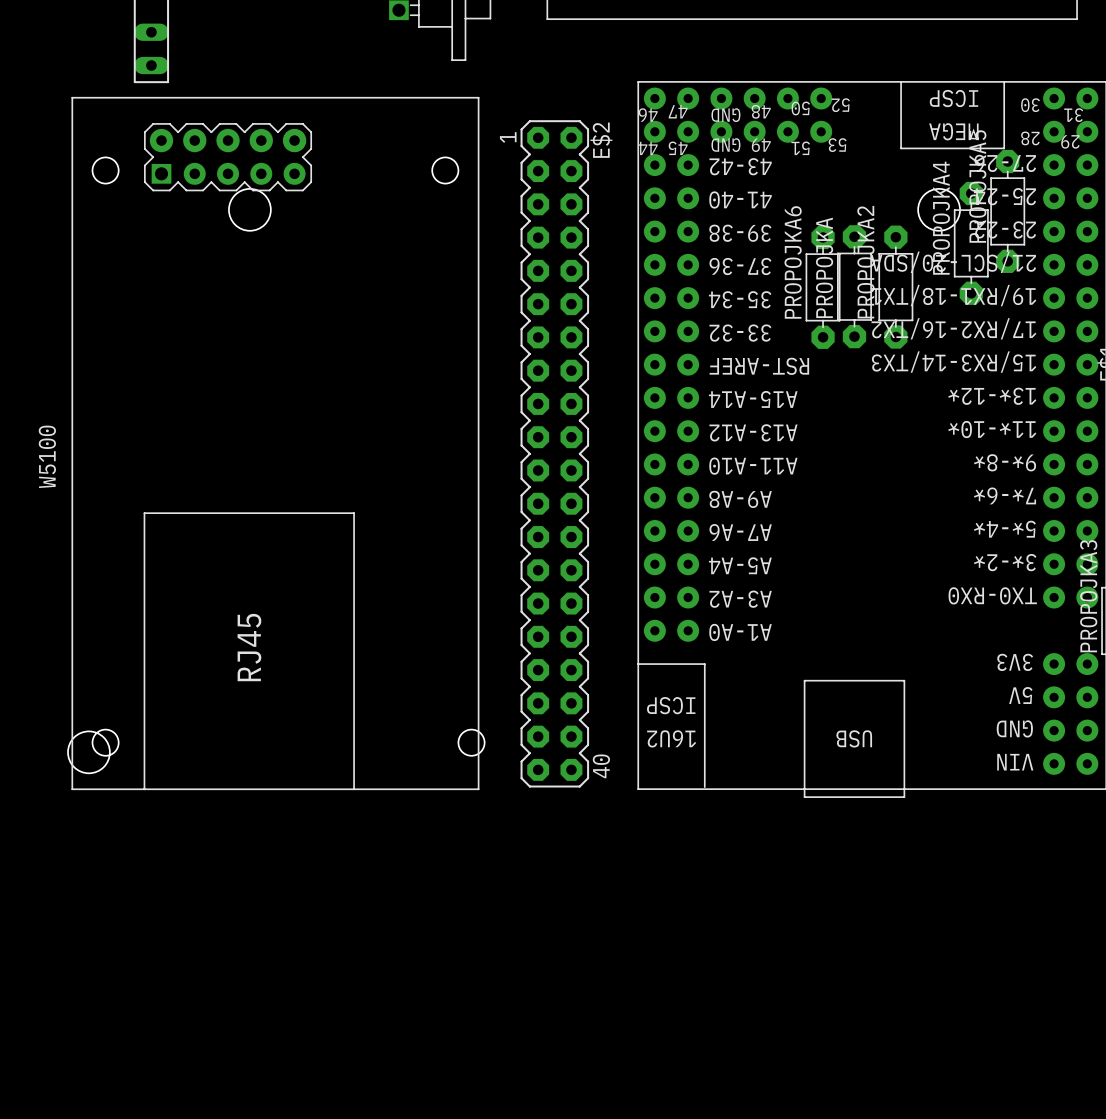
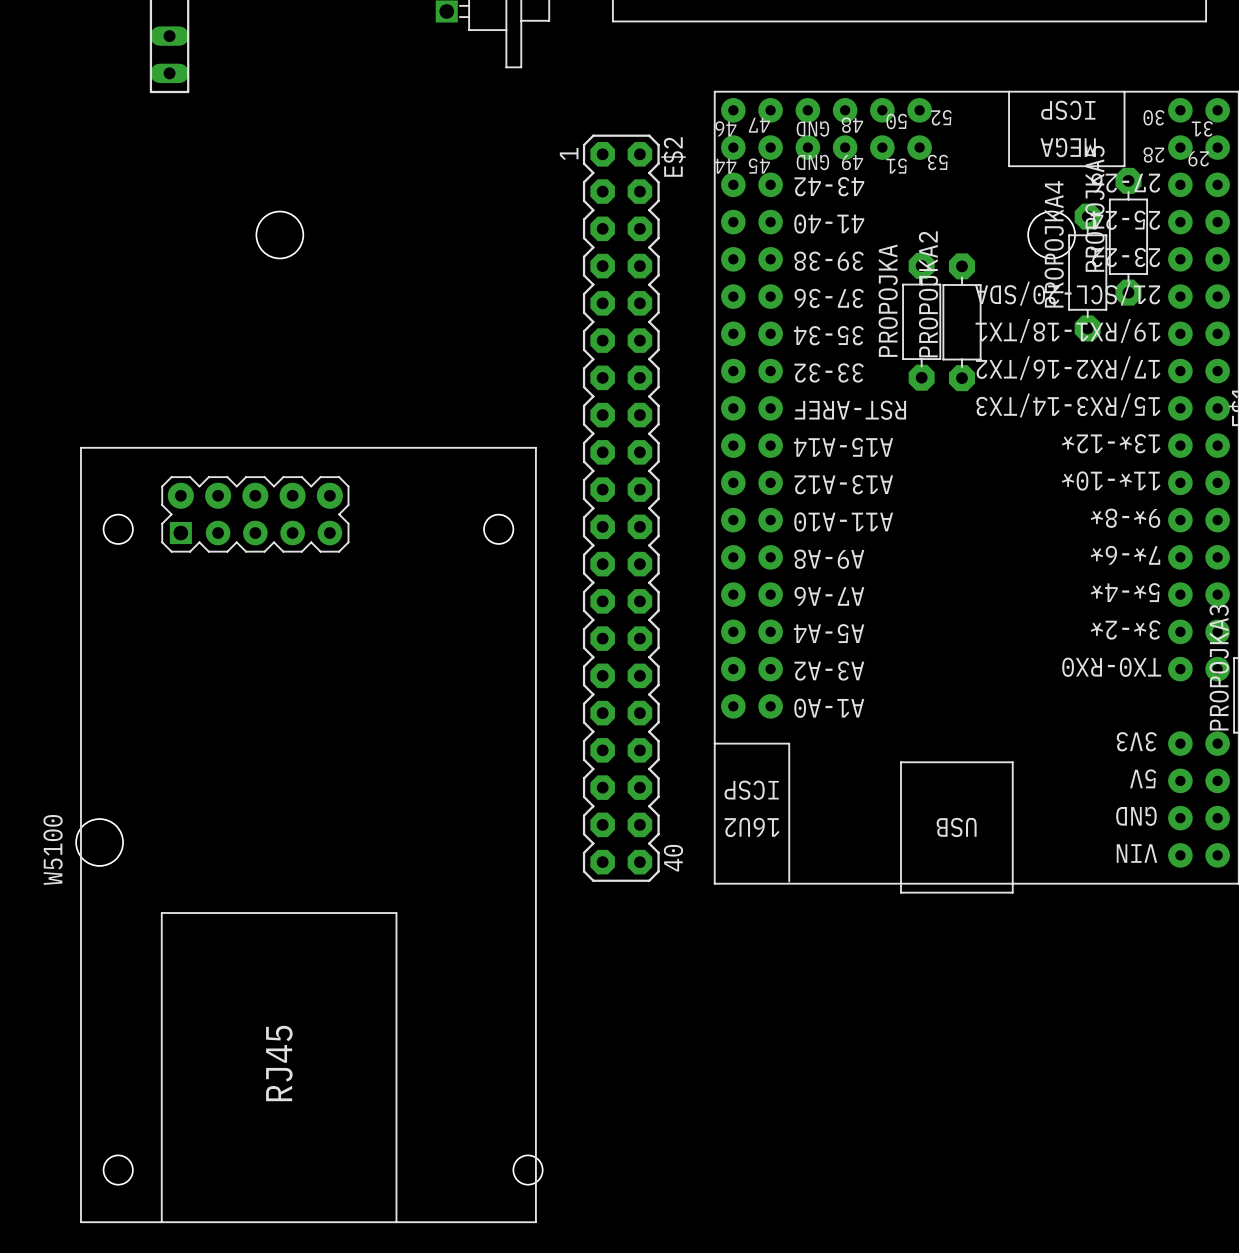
PROPOJKA6 name: PROPOJKA6 (793, 262) -> PROPOJKA (888, 300)
PROPOJKA: (854, 286) -> none
PROPOJKA2 position: (895, 287) -> (962, 322)
W5100 position: (278, 443) -> (311, 835)

